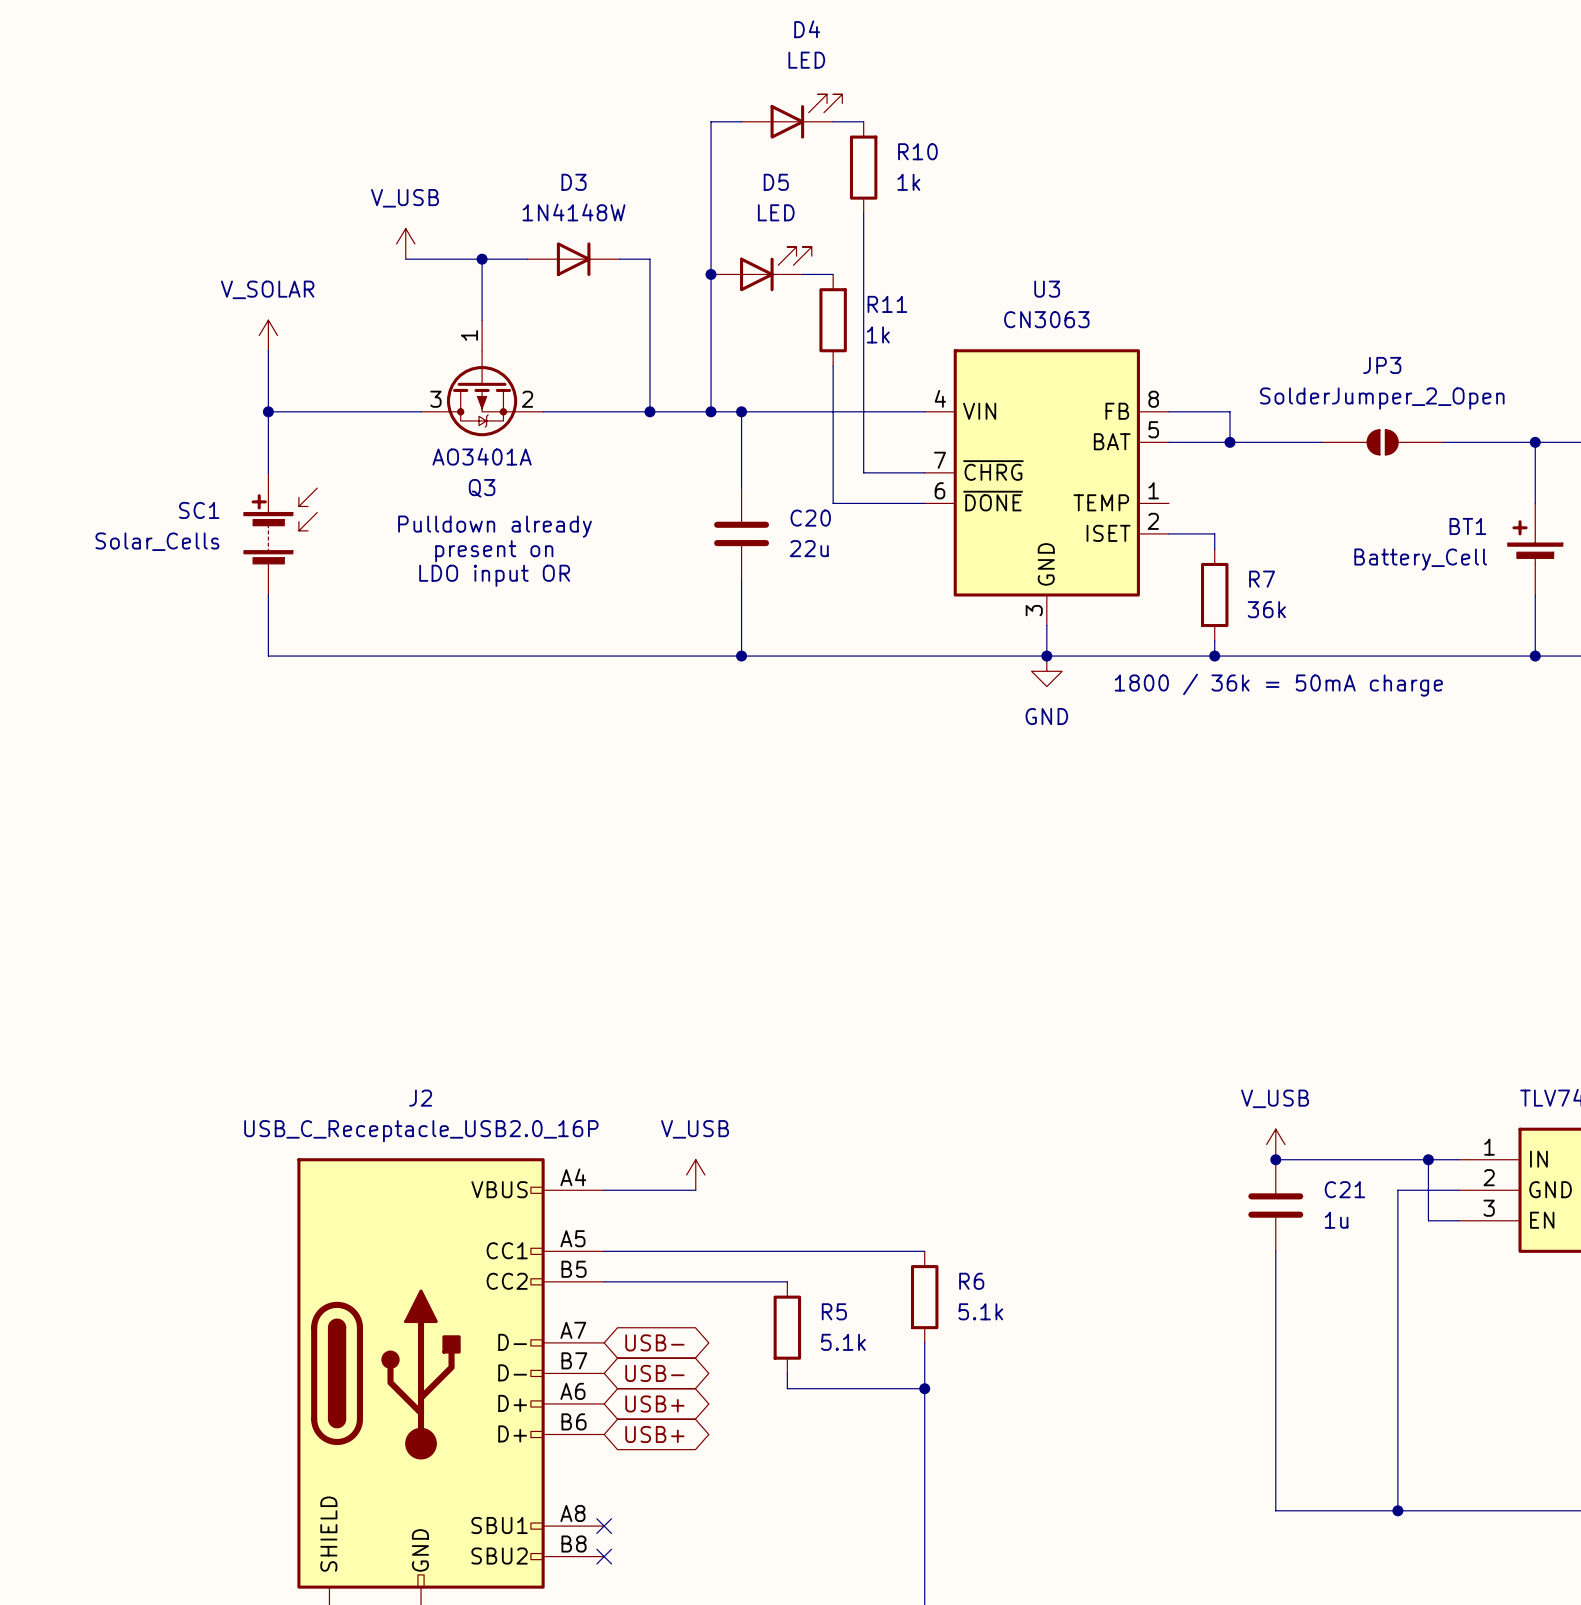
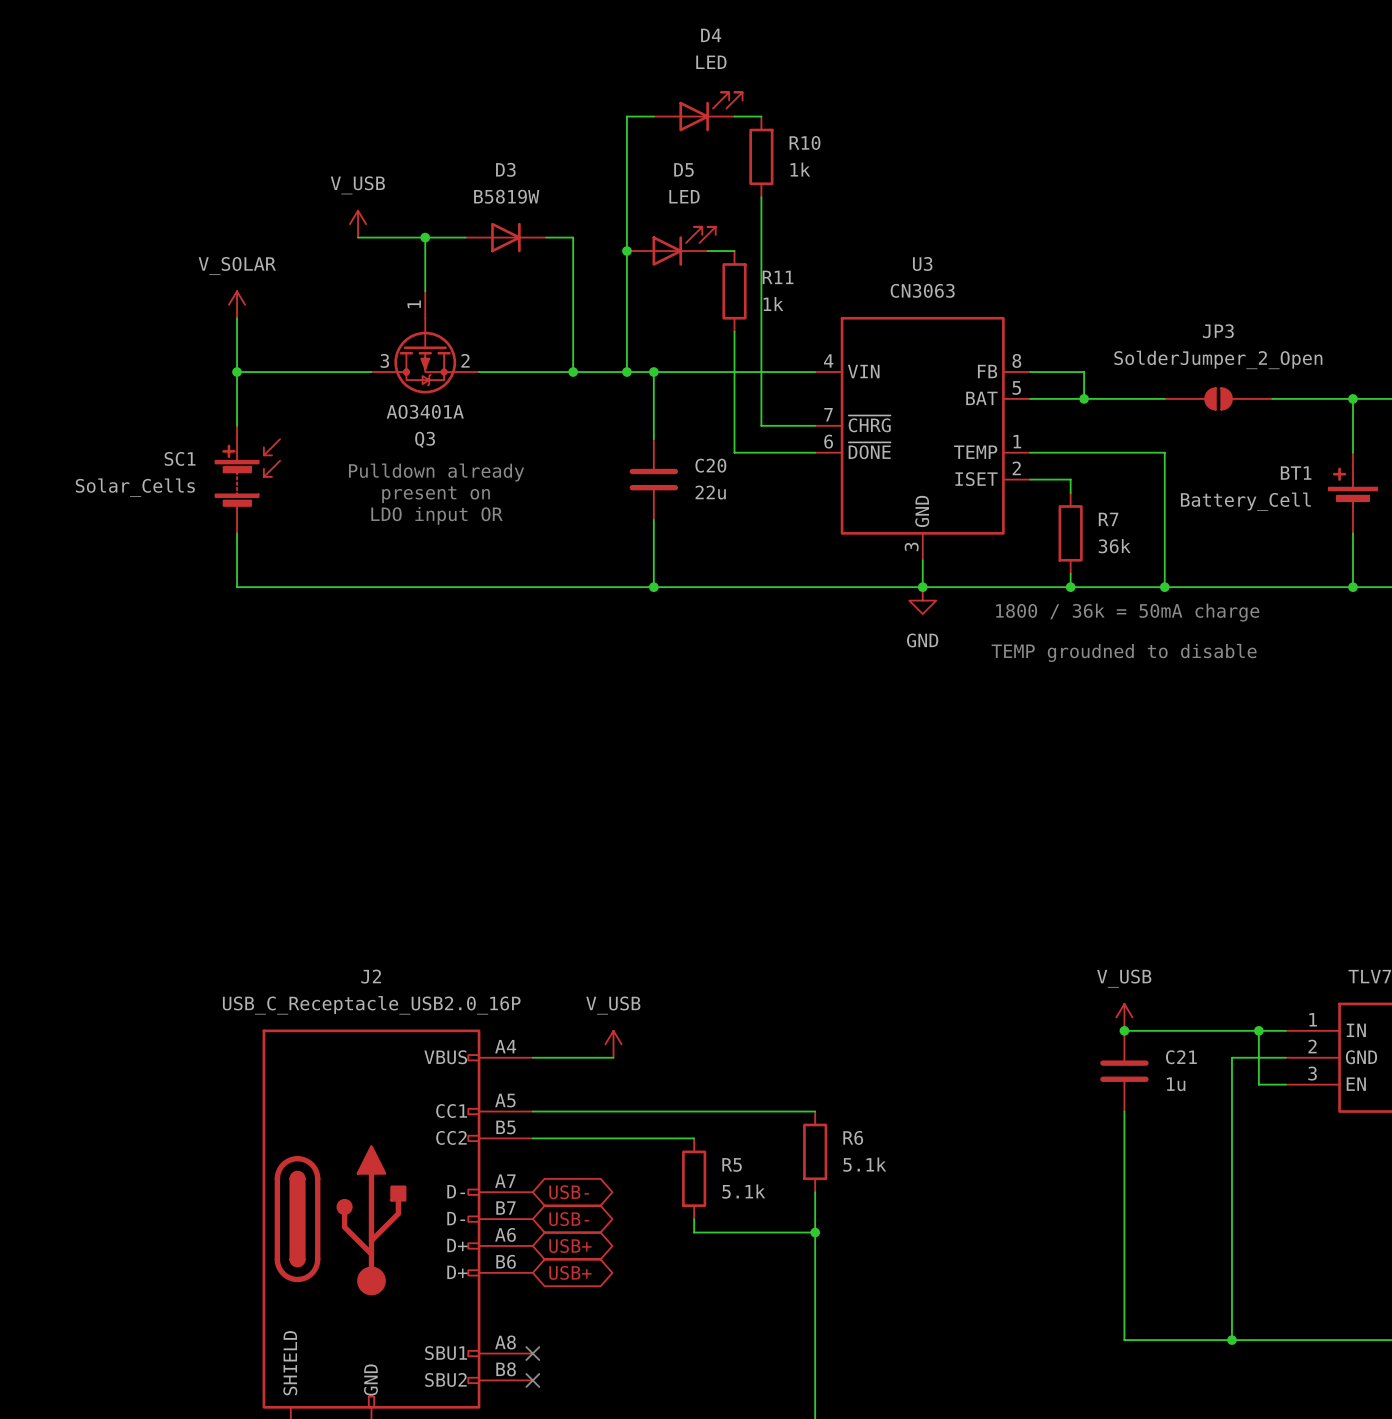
D3 value: 1N4148W (574, 212) -> B5819W (506, 196)
wire: none -> (1030, 452) (1164, 452) (1164, 587)
junction: none -> (1164, 587)
text: none -> TEMP groudned to disable (1124, 652)

